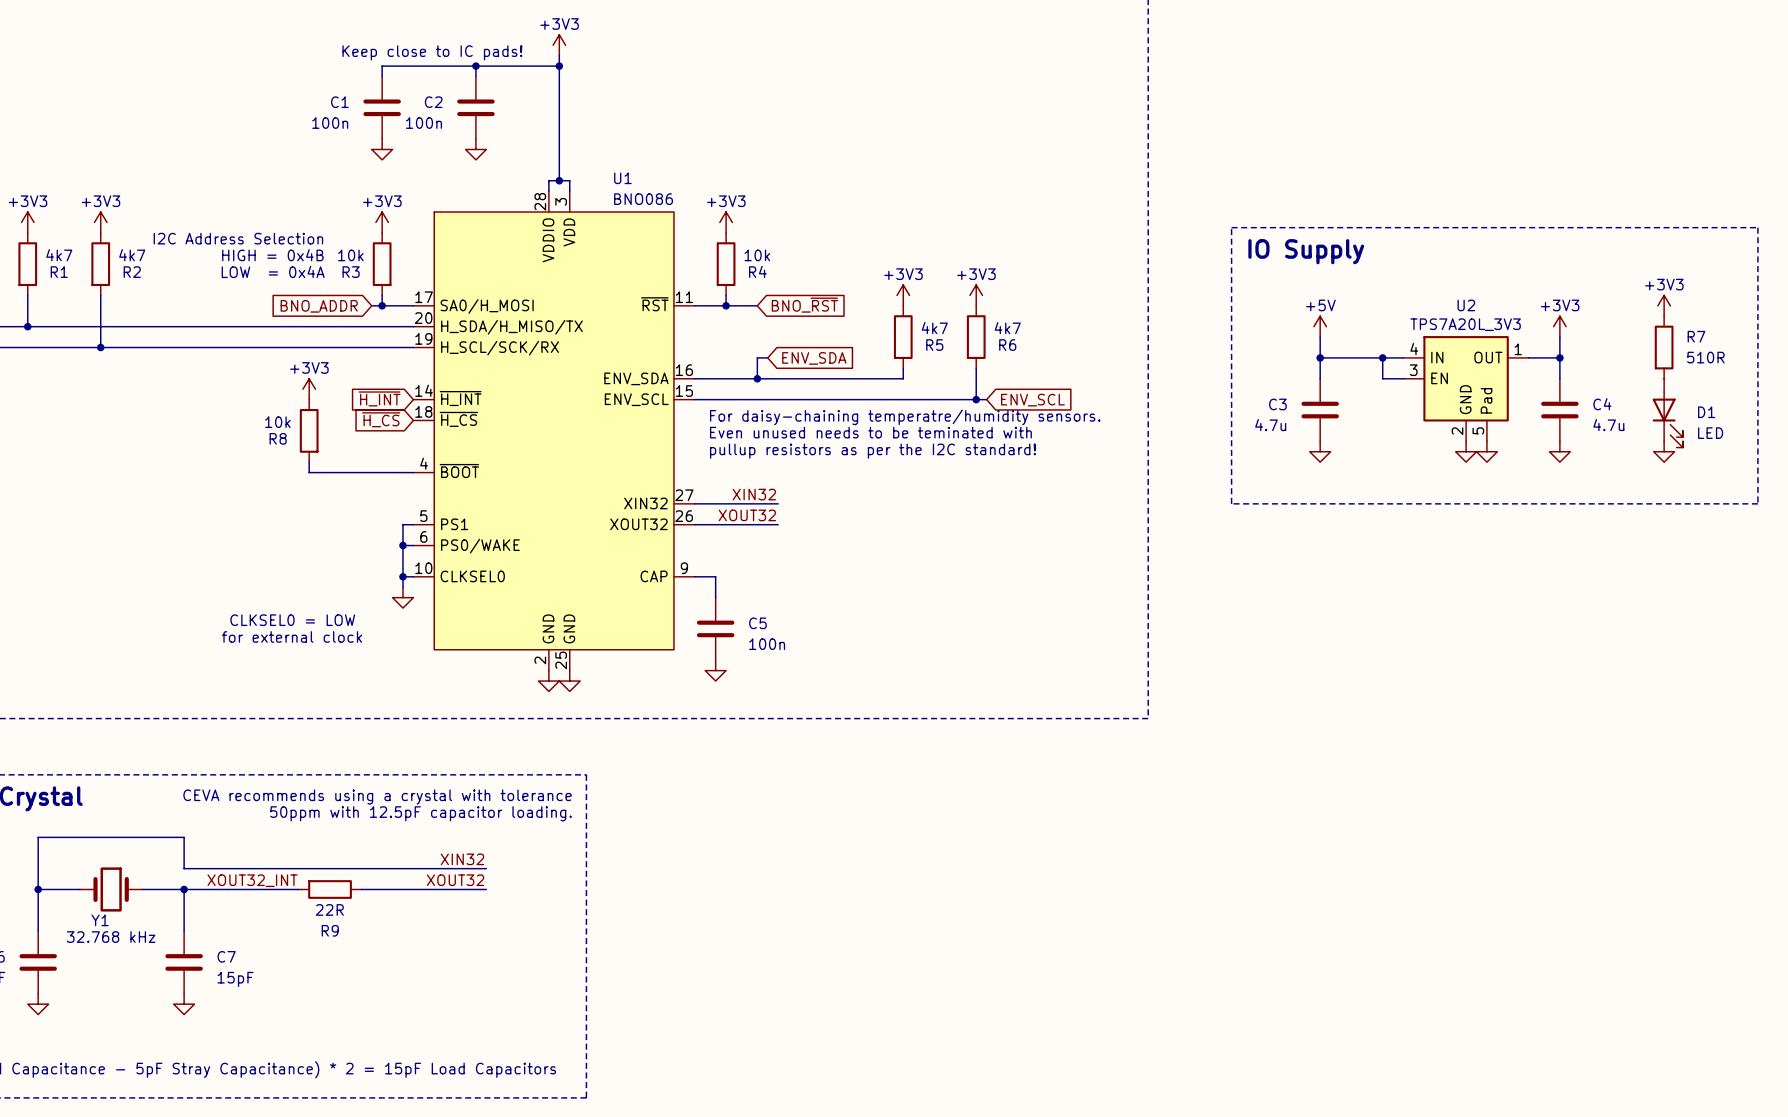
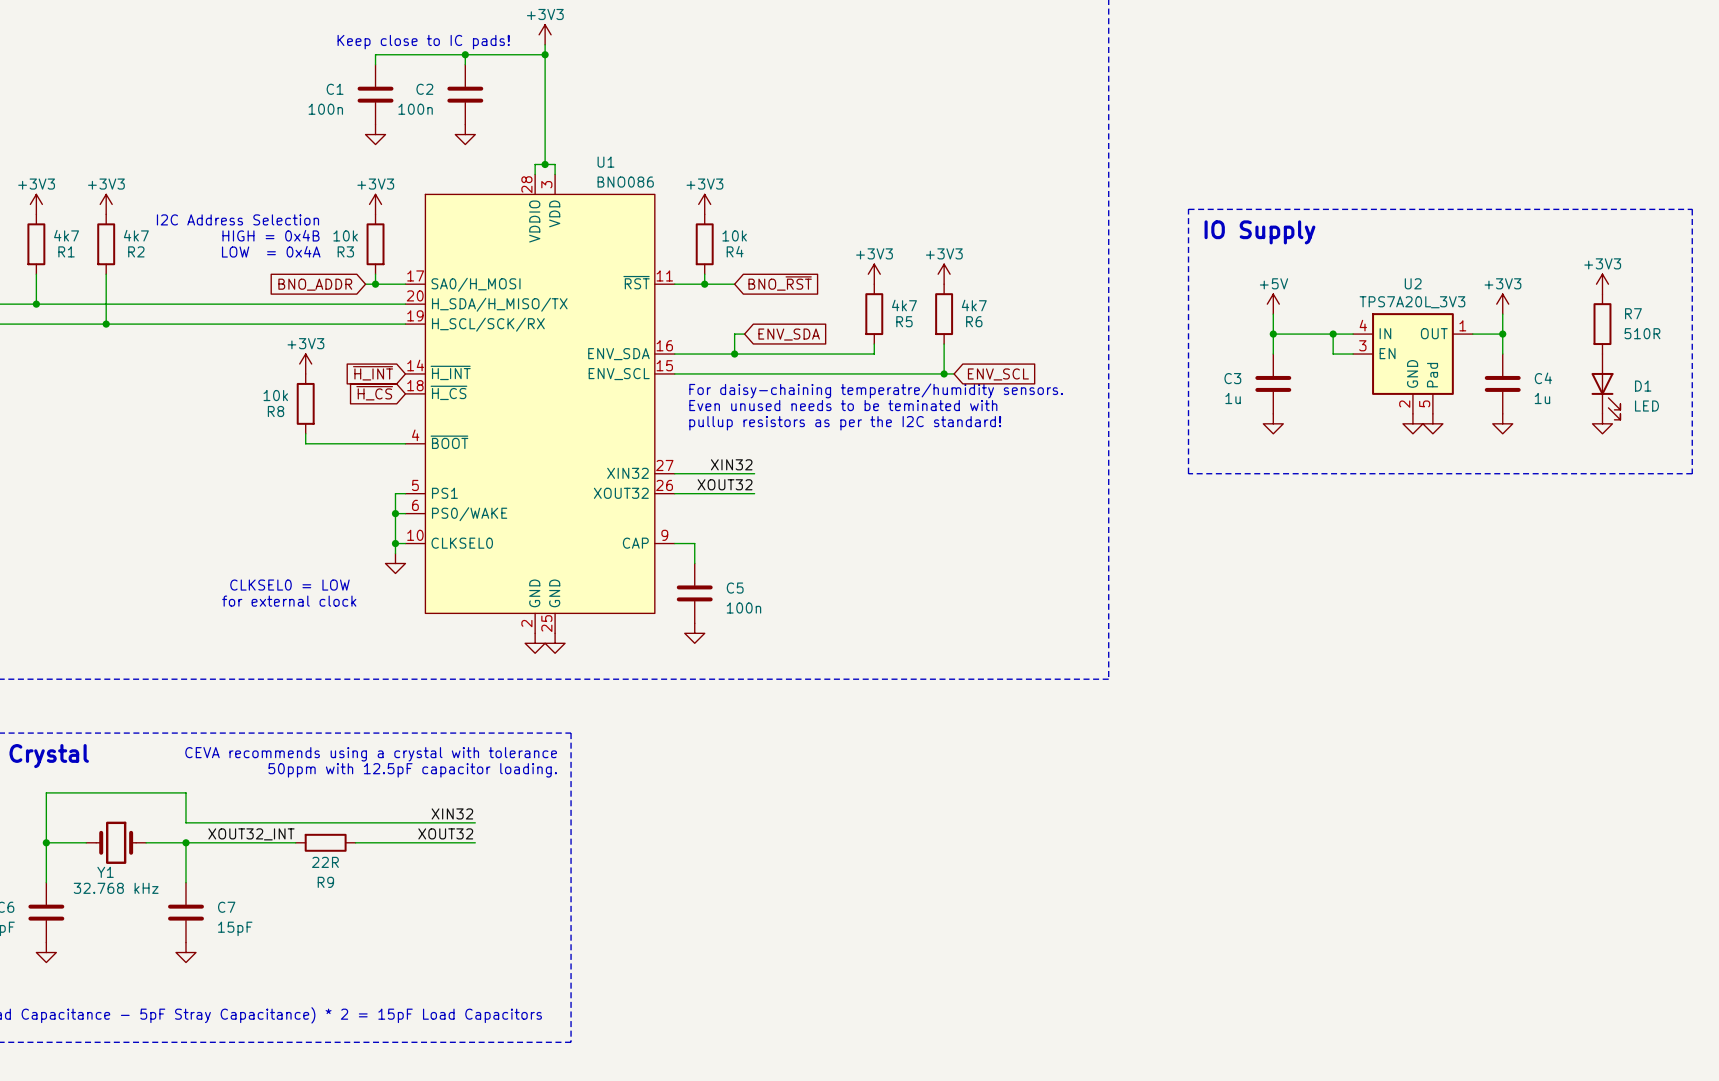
C3 value: 4.7u (1270, 425) -> 1u (1233, 398)
C4 value: 4.7u (1608, 425) -> 1u (1542, 398)

